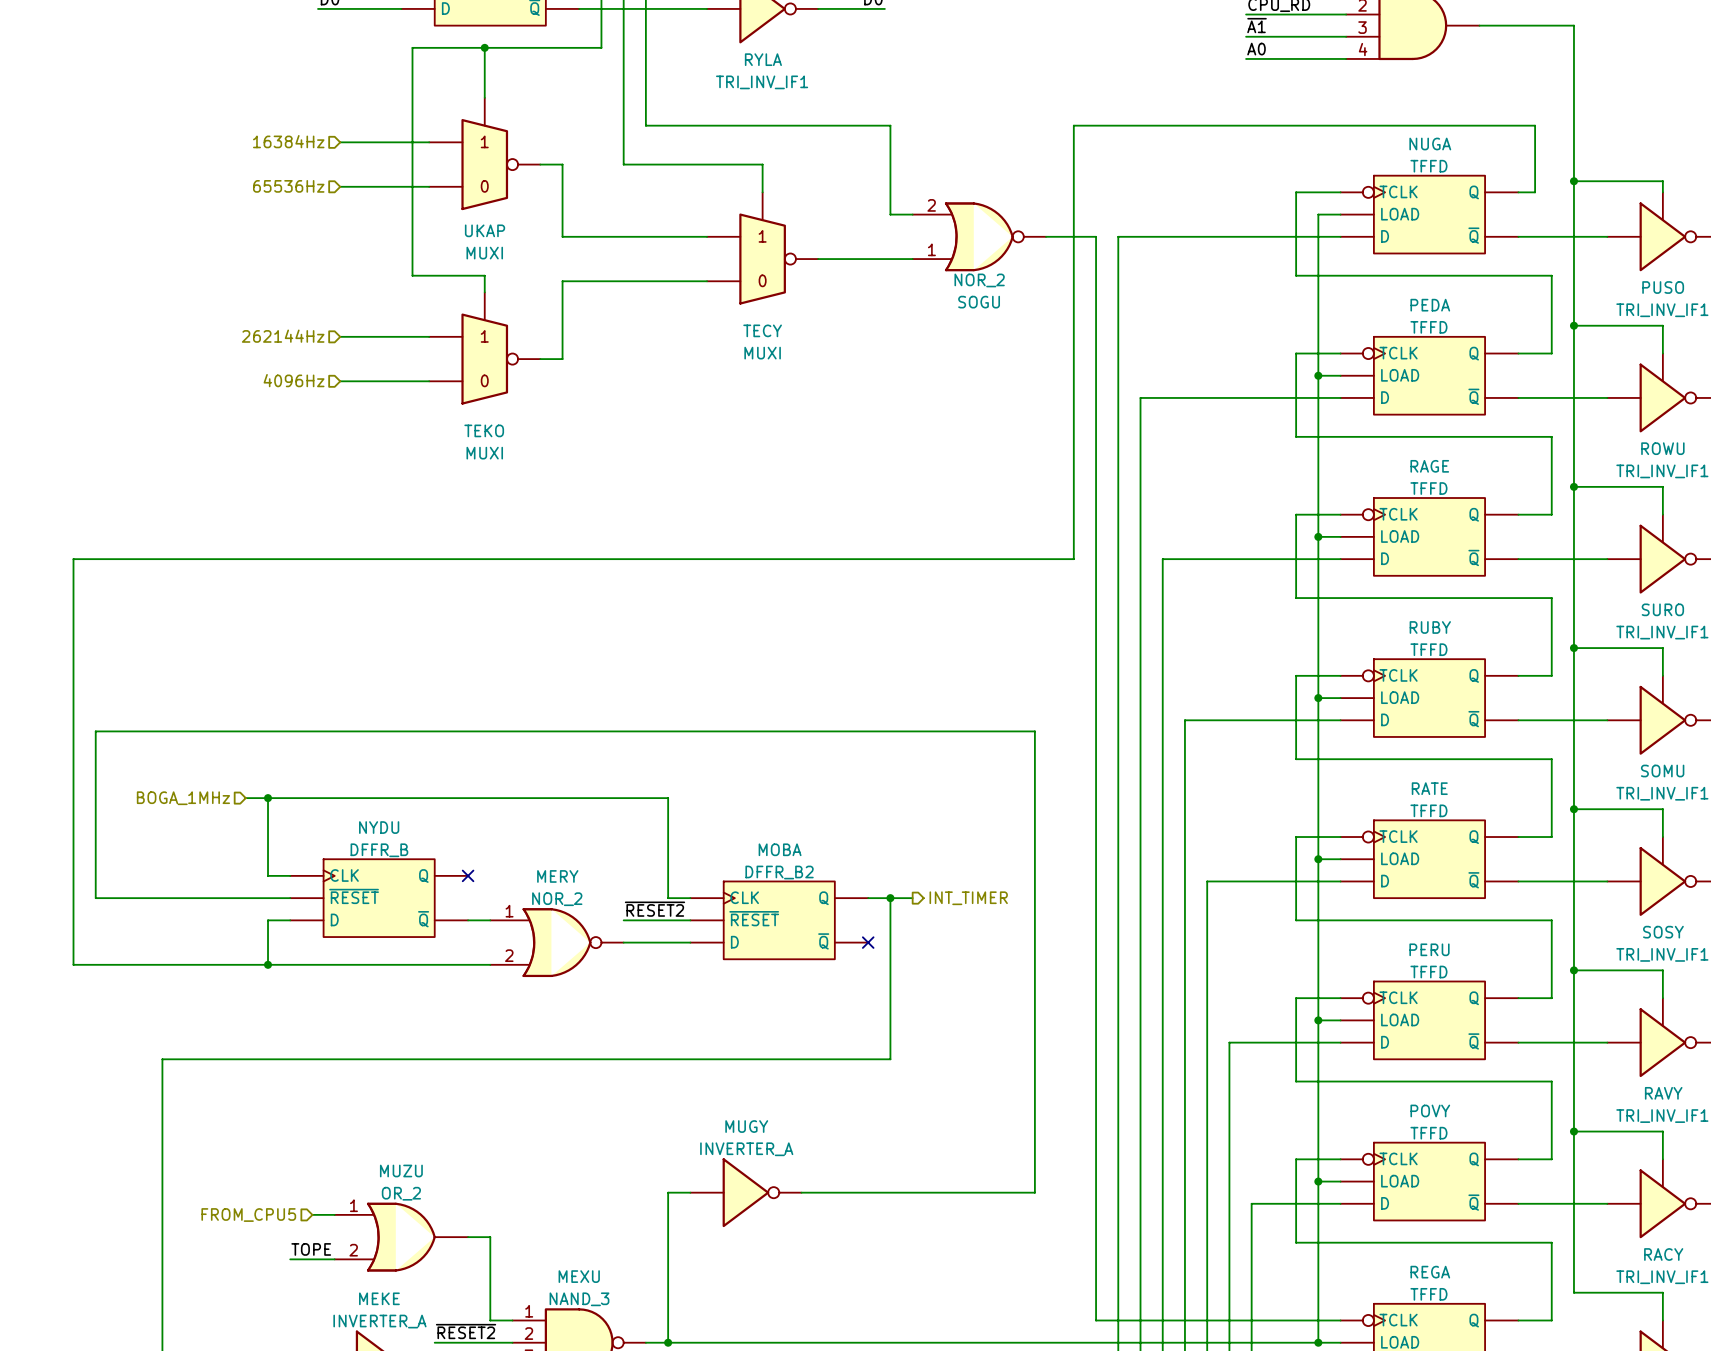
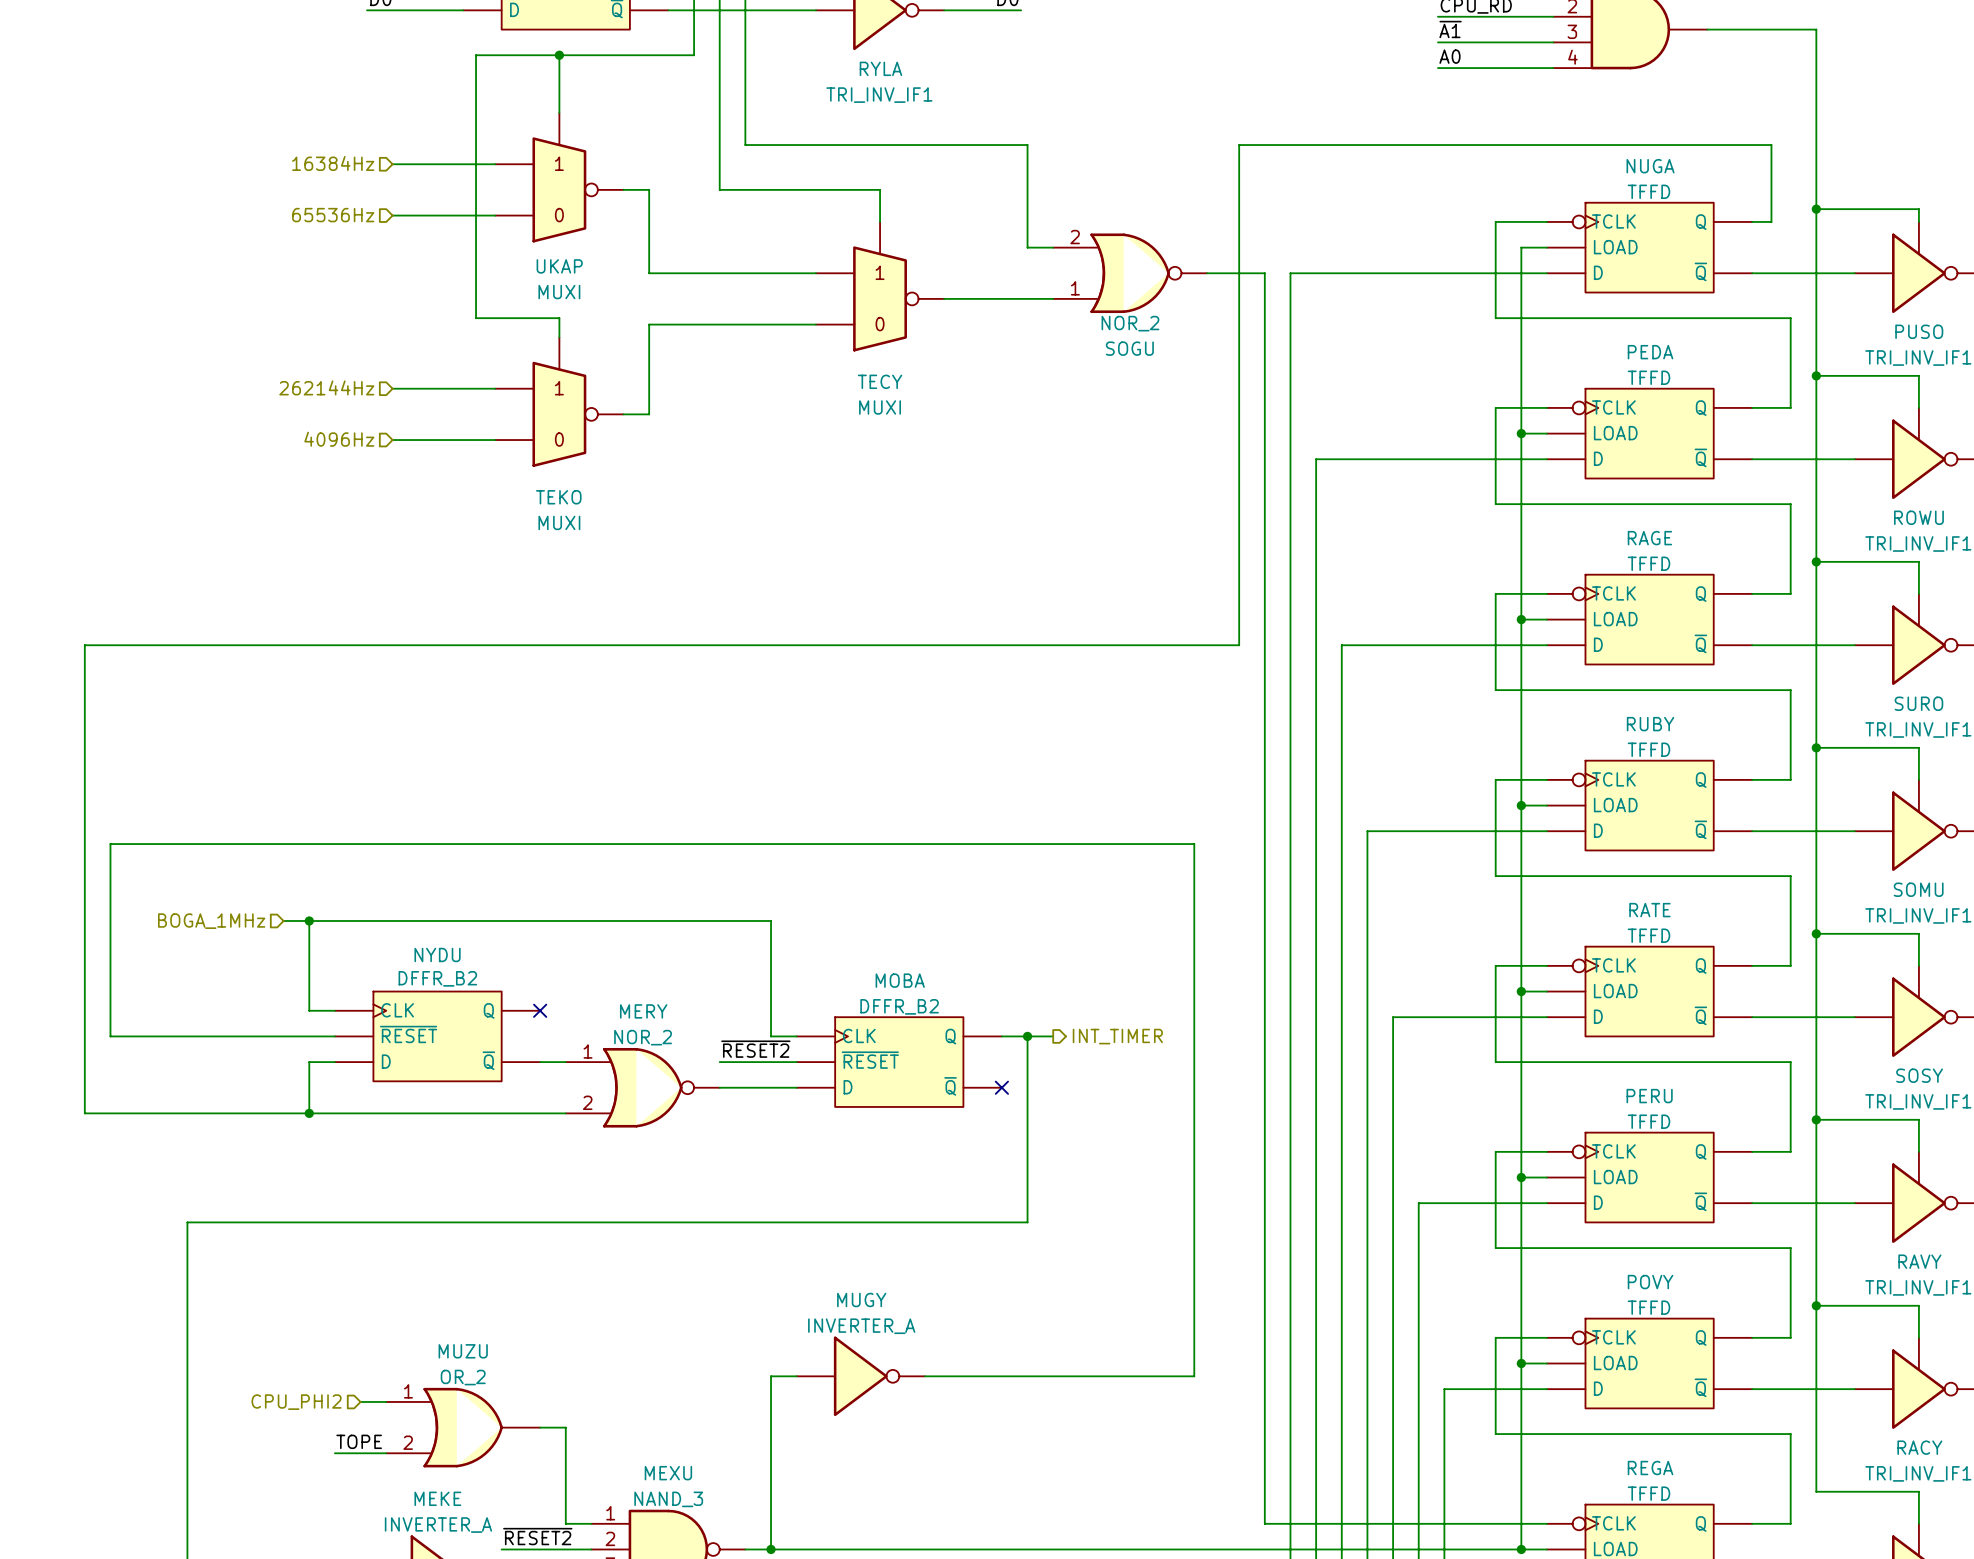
NYDU value: DFFR_B (379, 850) -> DFFR_B2 (437, 978)
hierarchical label: FROM_CPU5 (248, 1215) -> CPU_PHI2 (296, 1402)

